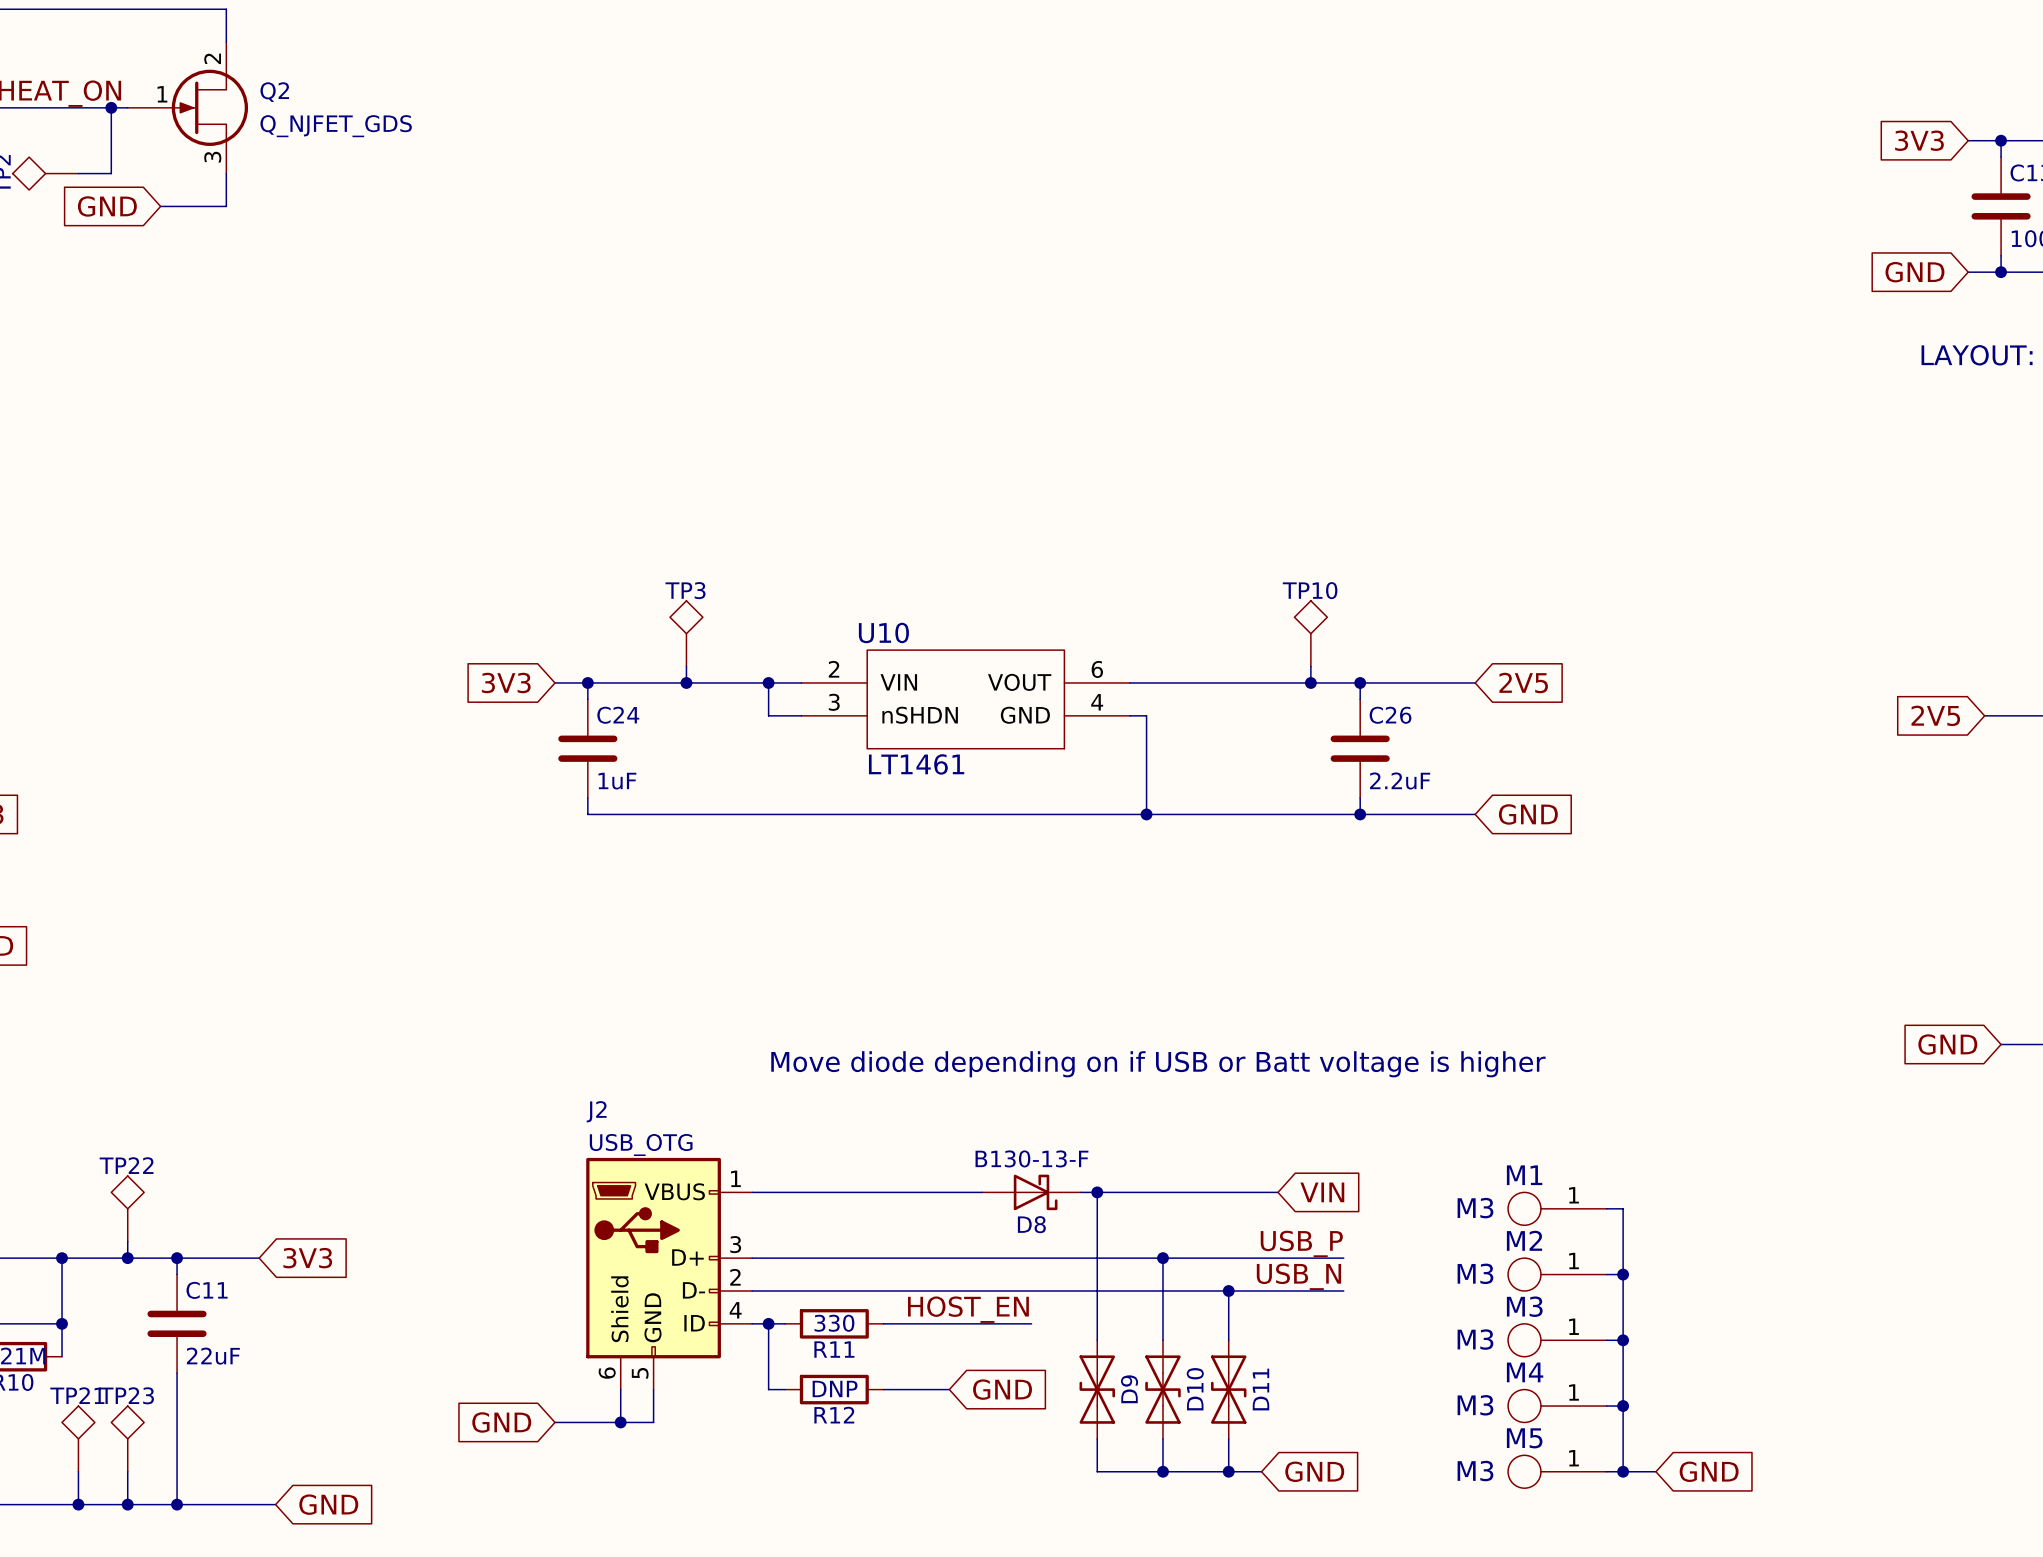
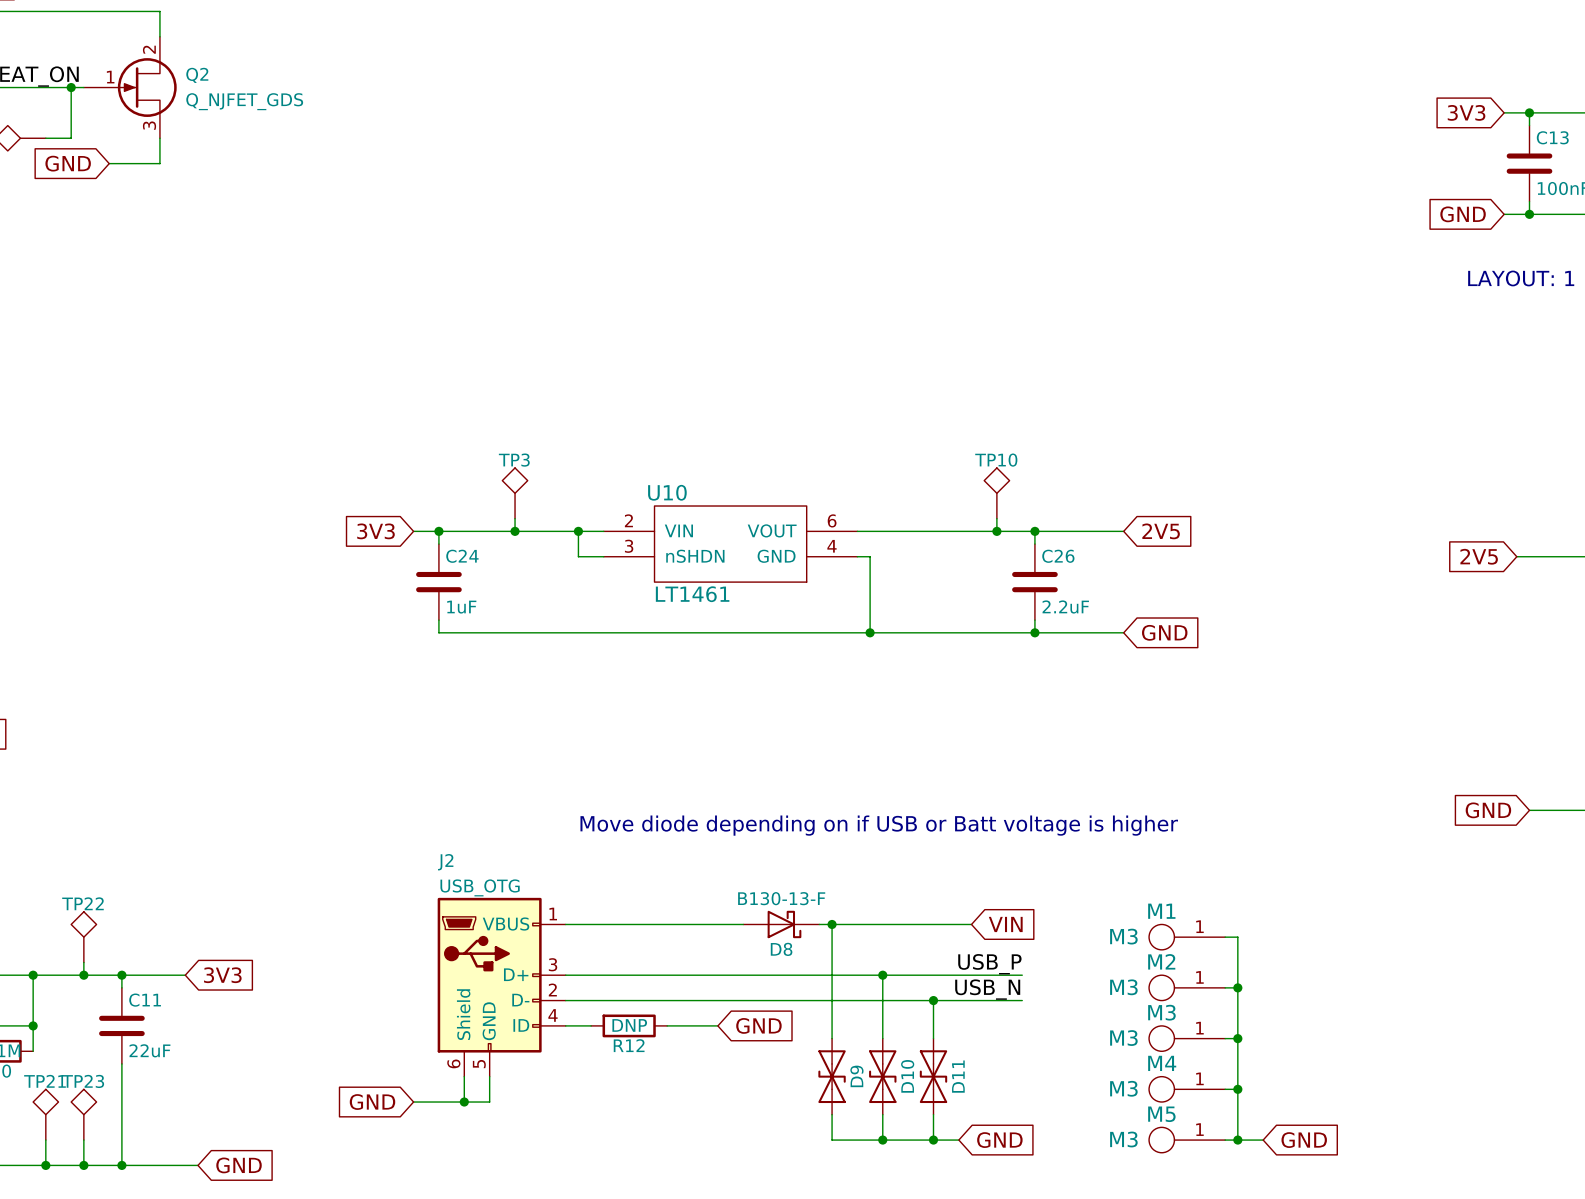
label: HOST_EN (968, 1309) -> none
wire: (768, 1323) (768, 1389) (785, 1389) -> none
junction: (768, 1323) -> none
R11 value: 330 (834, 1323) -> DNP (629, 1025)
wire: (949, 1323) (1031, 1323) -> none
R11 name: R11 (834, 1349) -> R12 (629, 1045)
R12: DNP (834, 1389) -> none
wire: (883, 1389) (949, 1389) -> none
global label position: GND (1002, 1389) -> GND (758, 1025)

